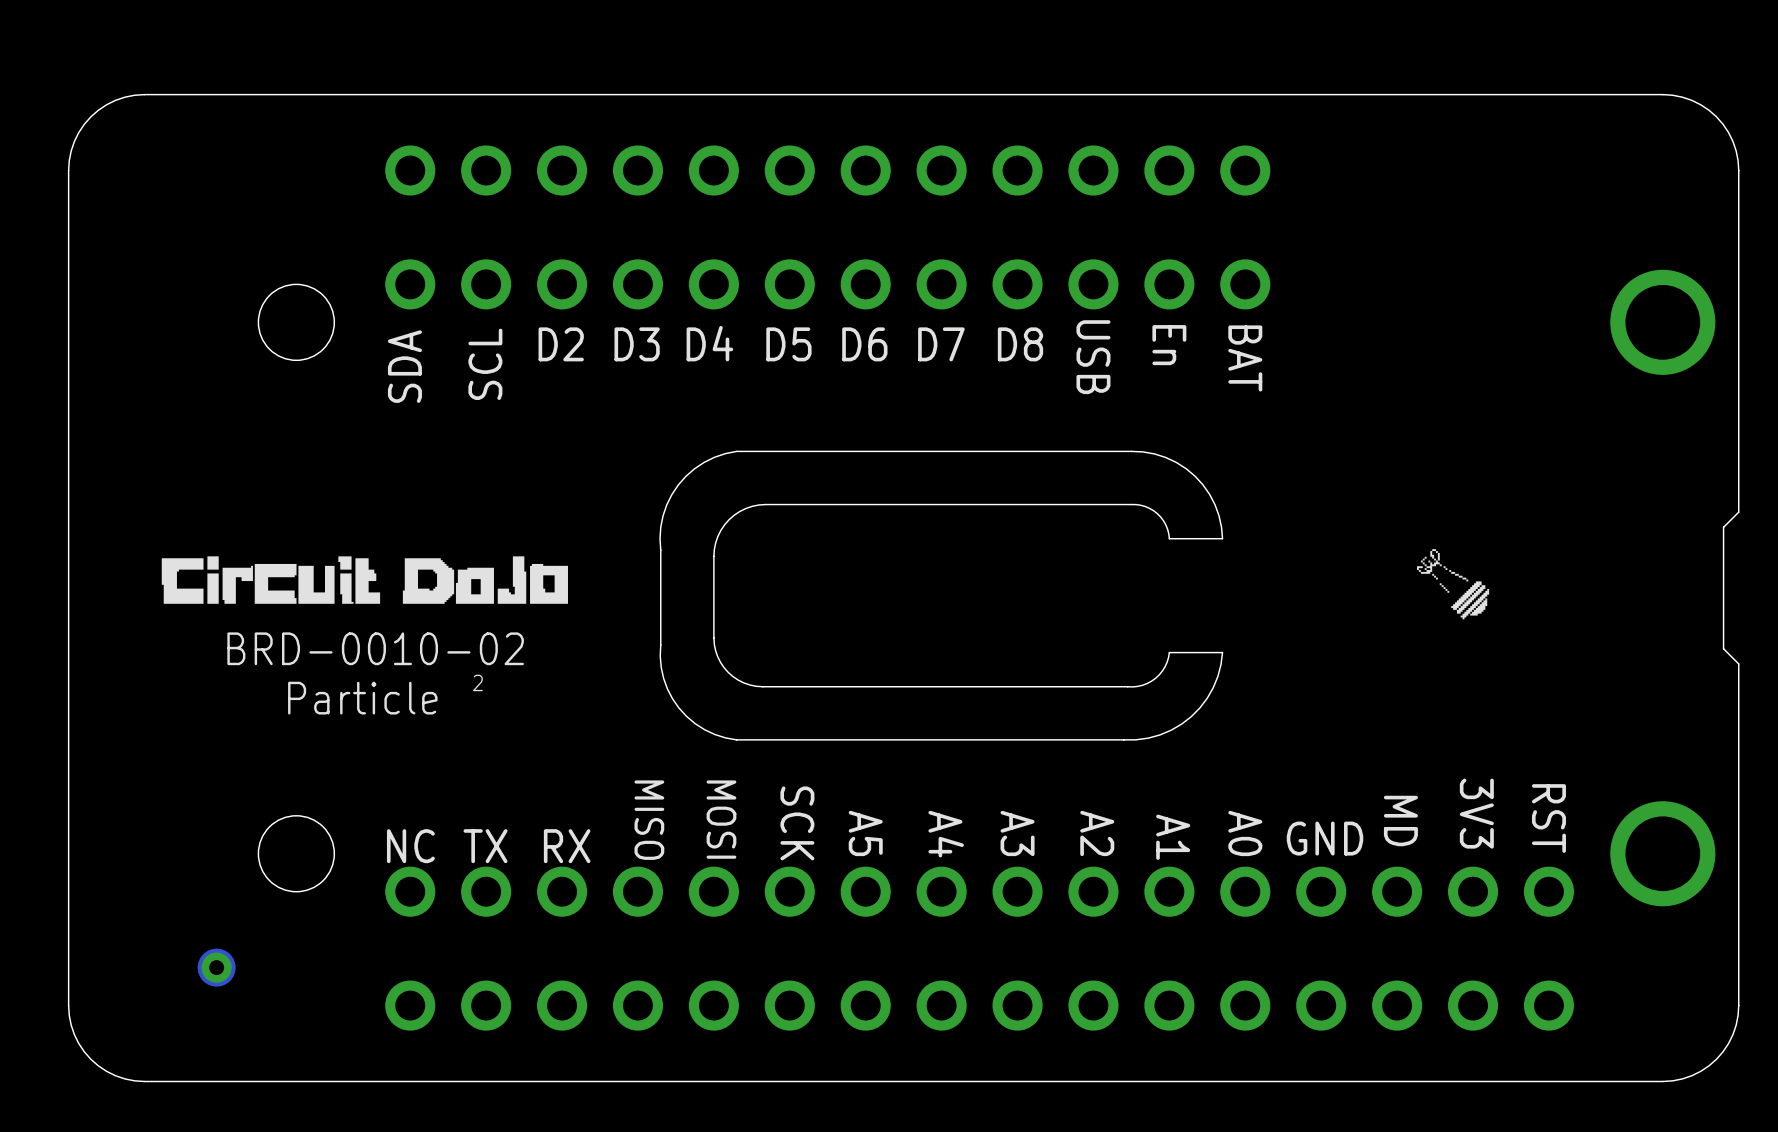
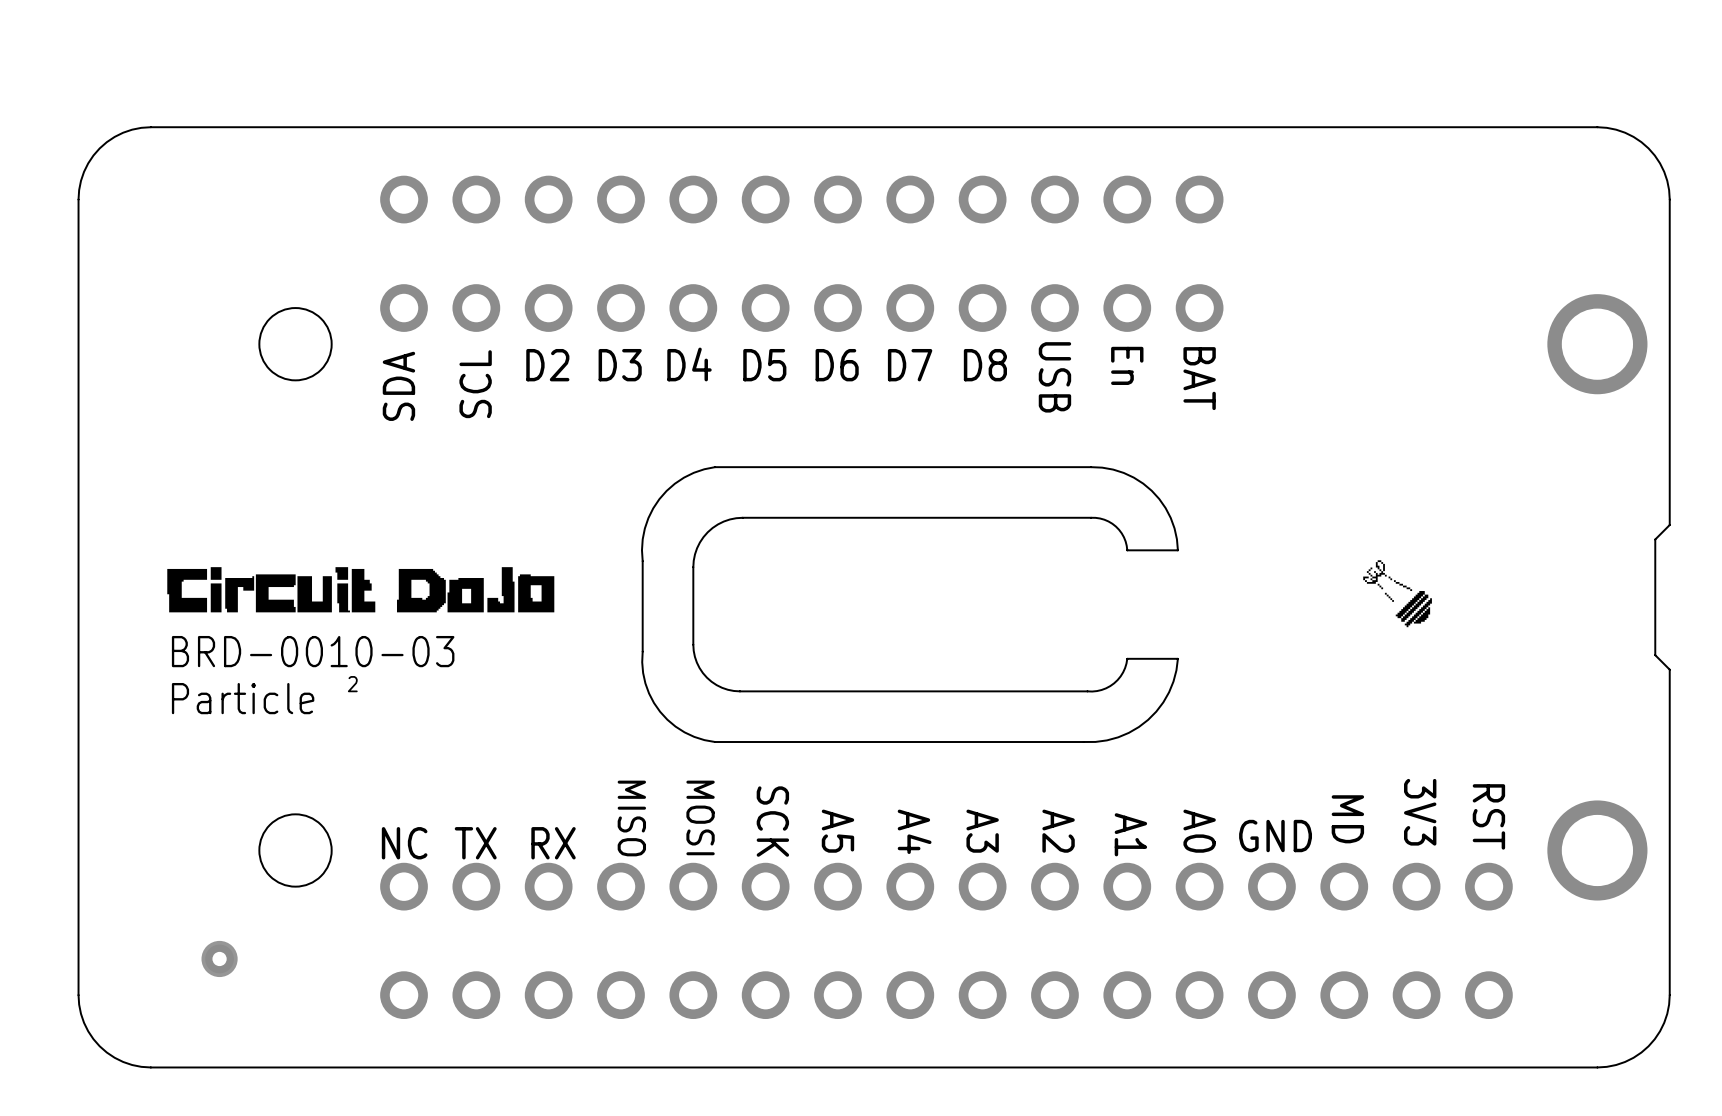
text: BRD-0010-02 (375, 648) -> BRD-0010-03 (313, 651)
text position: 2 (477, 682) -> 2 (352, 684)
text position: Particle (362, 698) -> Particle (243, 698)

